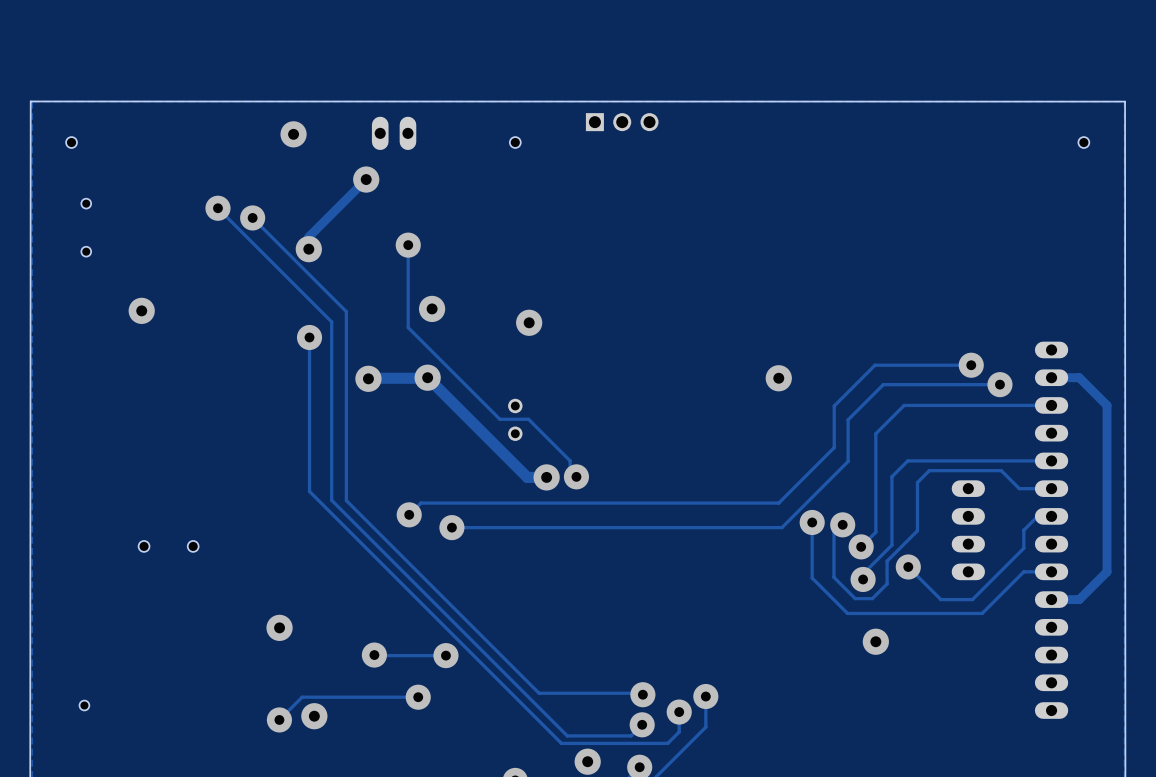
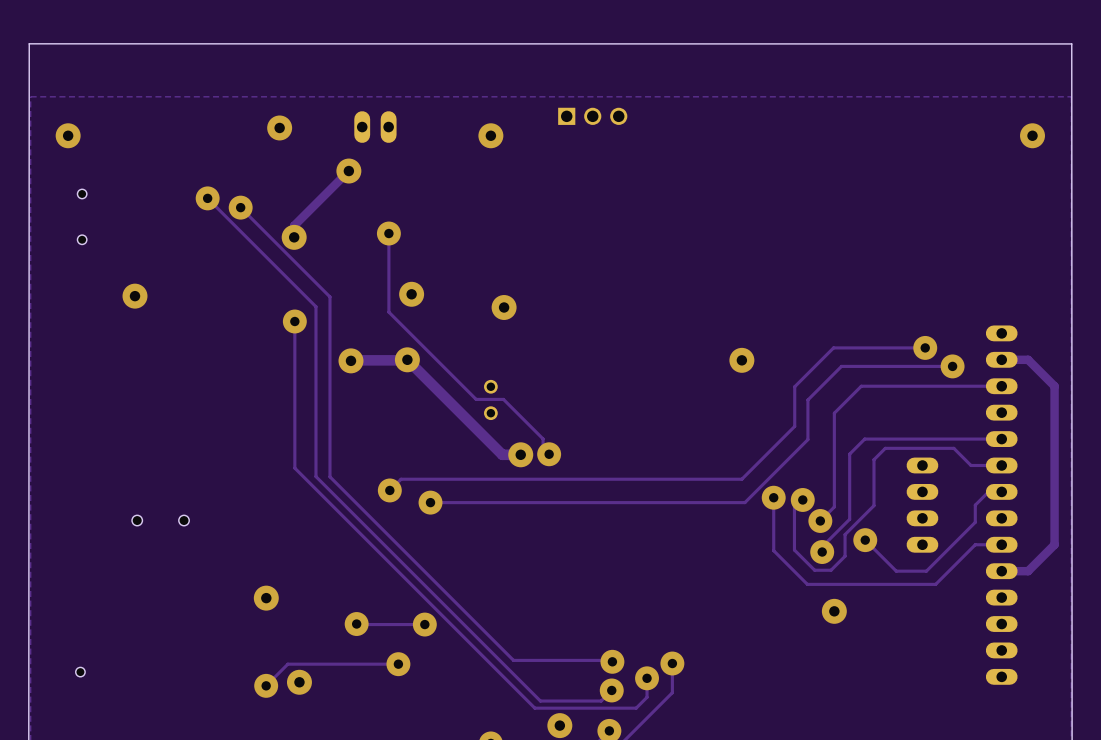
board edge: (30, 101) (1125, 101) -> (29, 96) (29, 43) (1071, 43) (1071, 96)
hole: (71, 142) -> none
via: none -> (68, 135)
hole: (515, 142) -> none
via: none -> (490, 135)
hole: (1083, 142) -> none
via: none -> (1032, 135)

